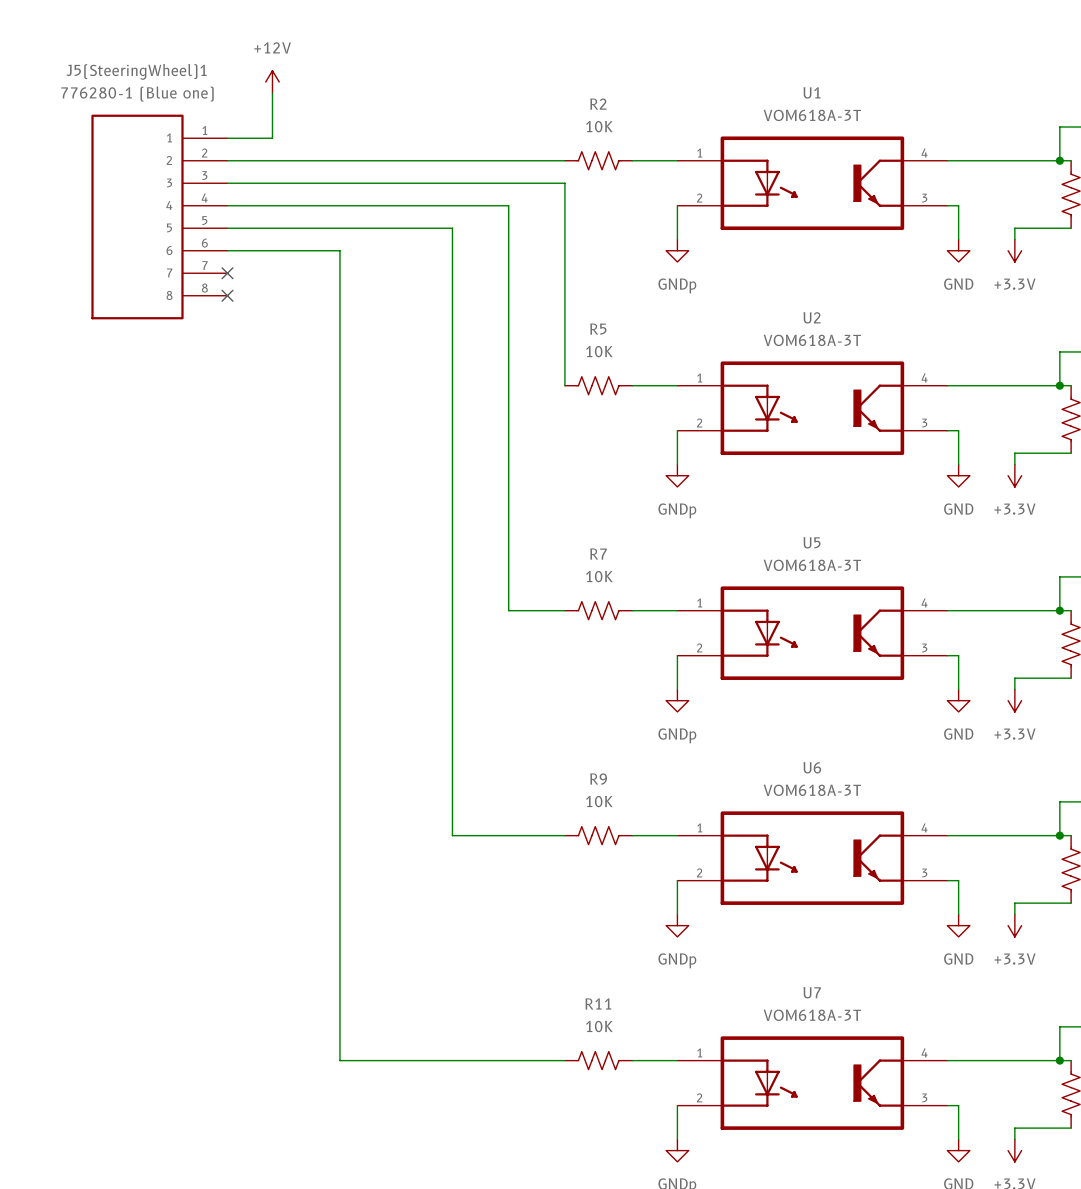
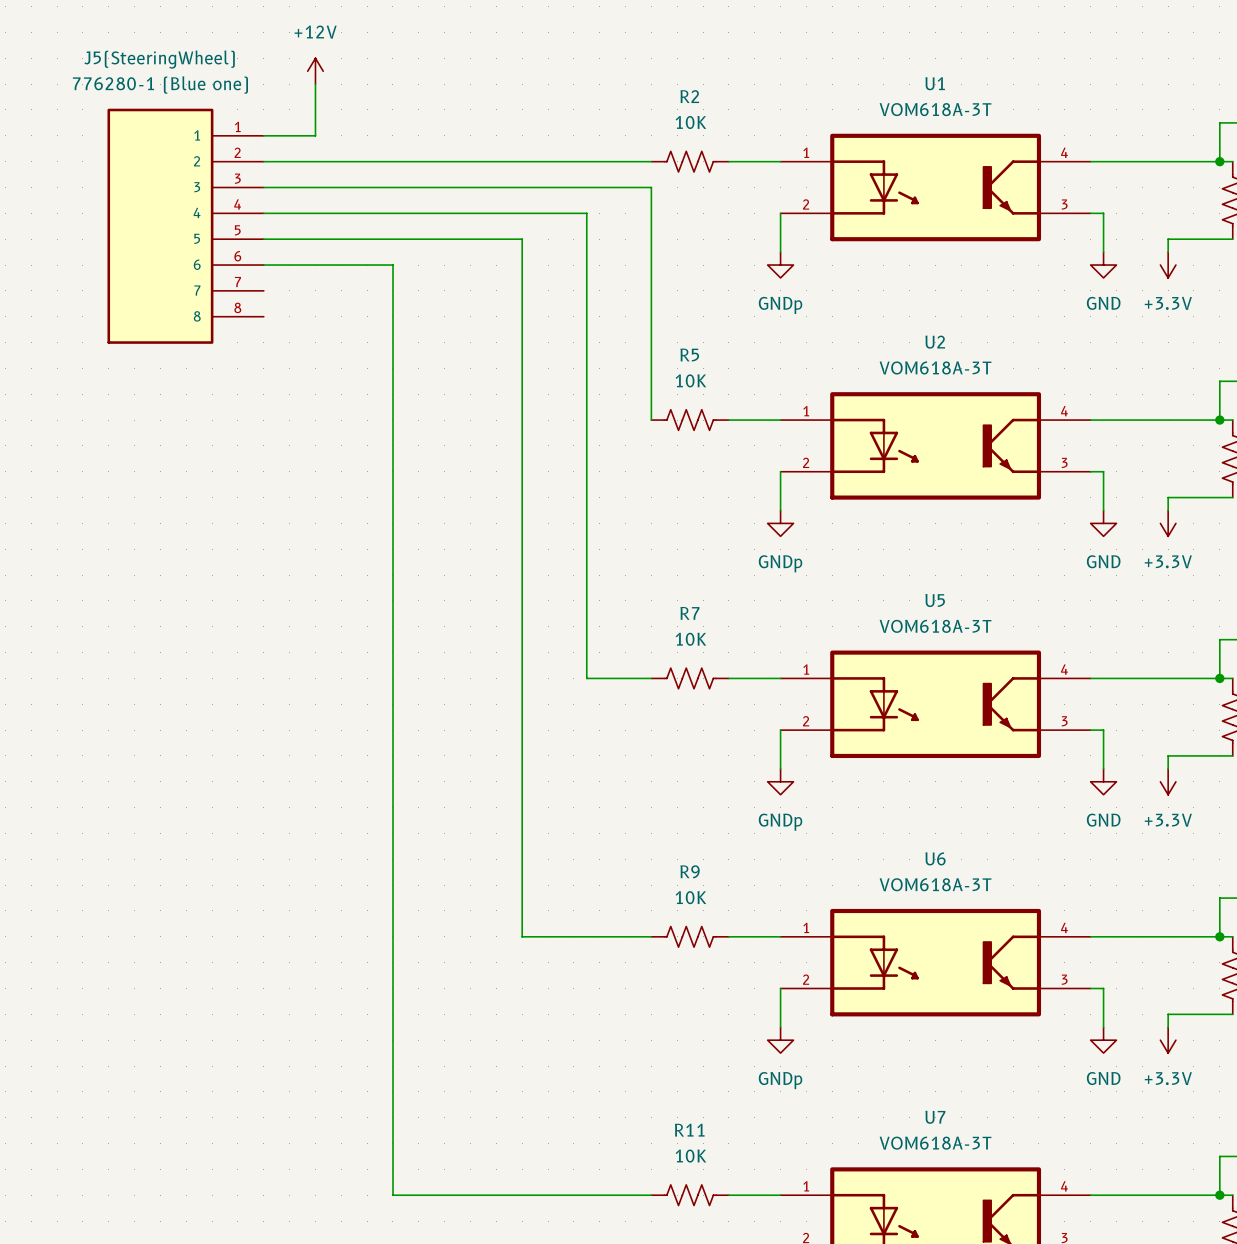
J5(SteeringWheel)1 name: J5(SteeringWheel)1 (136, 71) -> J5(SteeringWheel) (159, 59)
no-connect mark: (227, 273) -> none
no-connect mark: (227, 295) -> none

